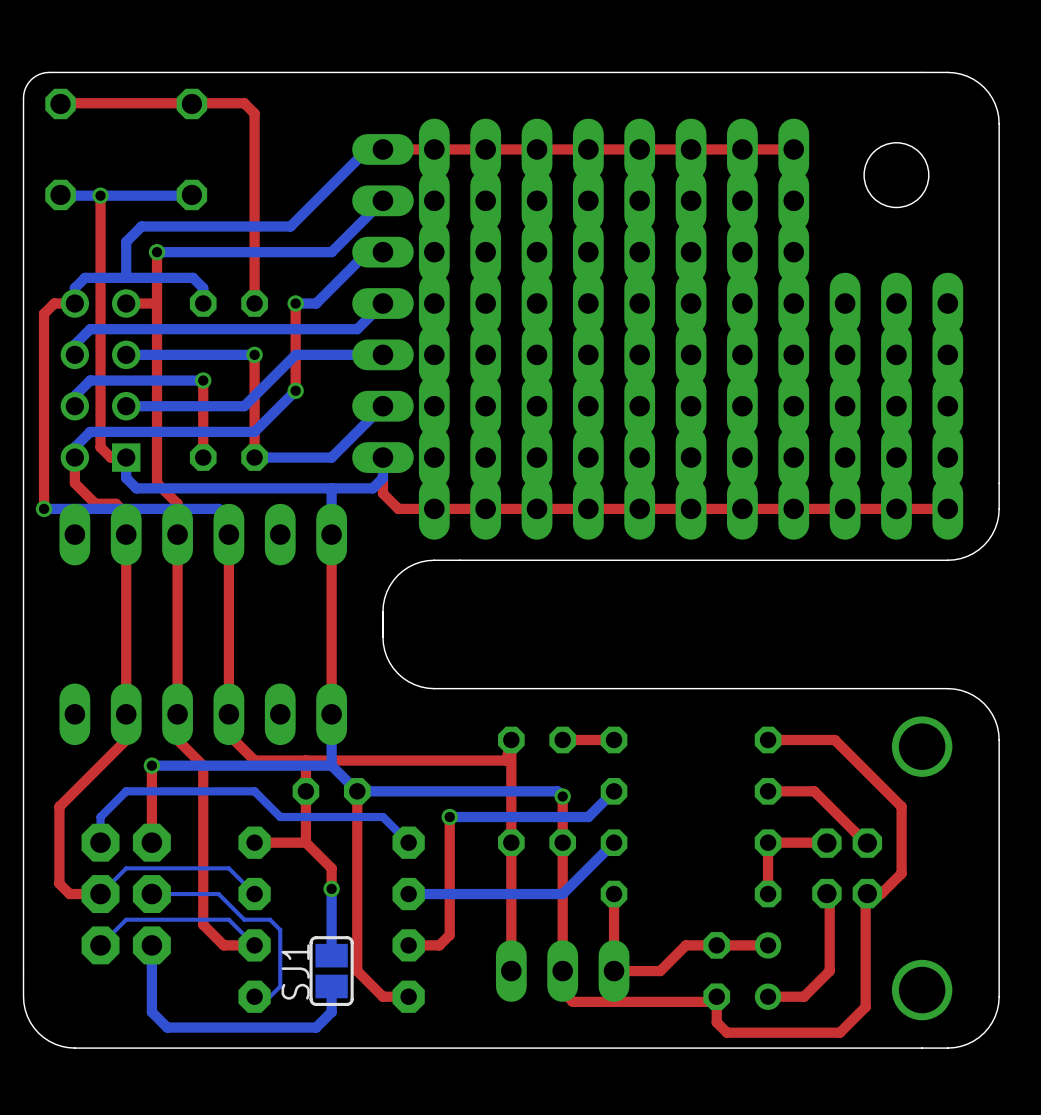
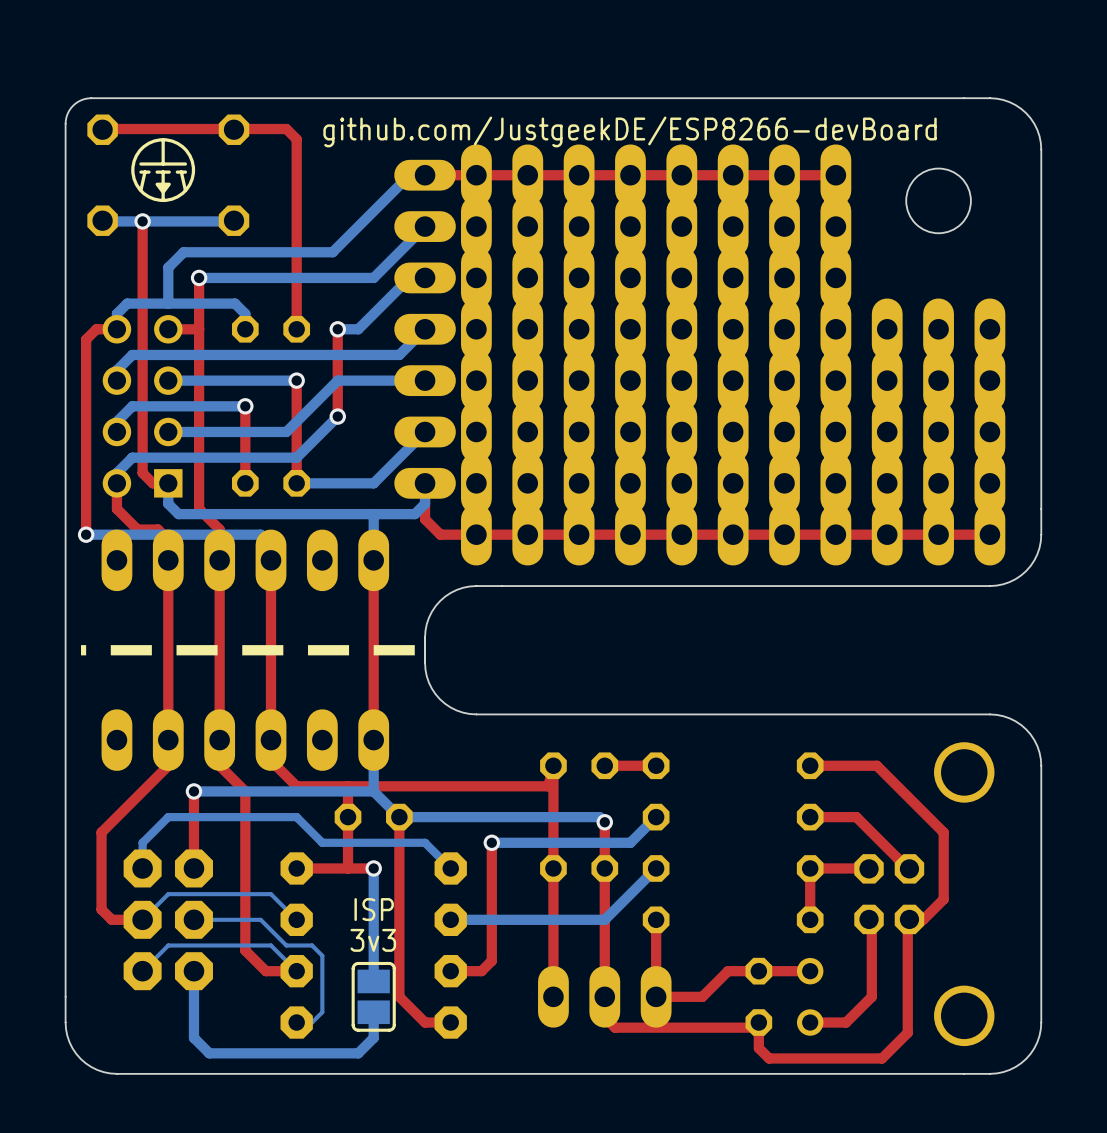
text: none -> github.com/JustgeekDE/ESP8266-devBoard (630, 131)
drawing: none -> [131, 138, 196, 203]
line: none -> (414, 650) (81, 650)
top track: (305, 842) (331, 868) (331, 888) -> (348, 868) (373, 868)
bottom track: none -> (373, 868) (373, 914)
text: none -> ISP (374, 909)
via position: (331, 888) -> (373, 868)
text: none -> 3v3 (373, 940)
SJ1 name: SJ1 (295, 971) -> none

